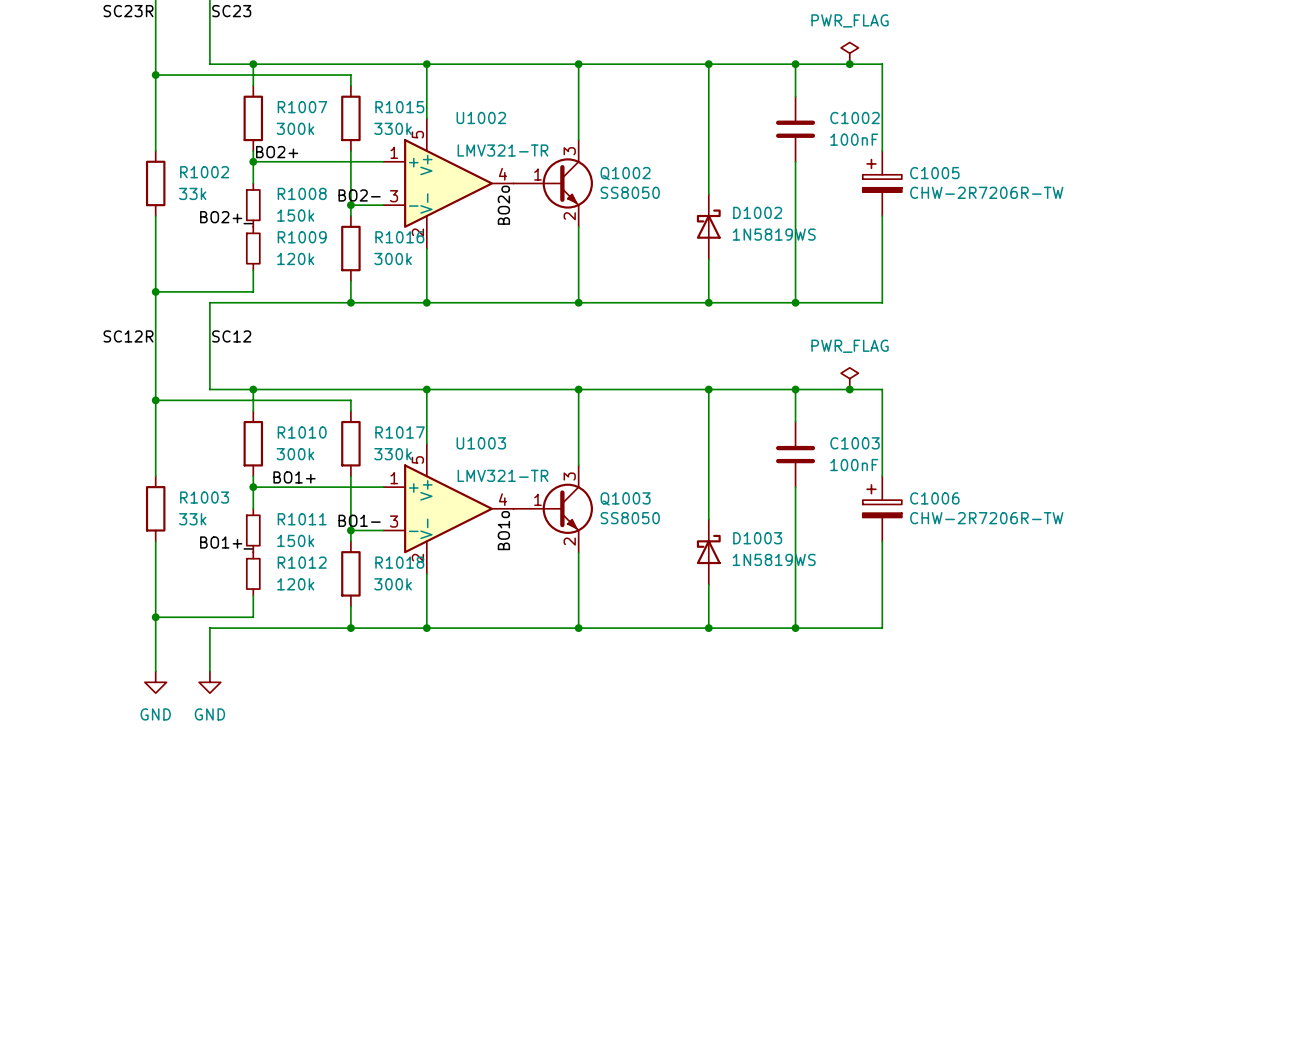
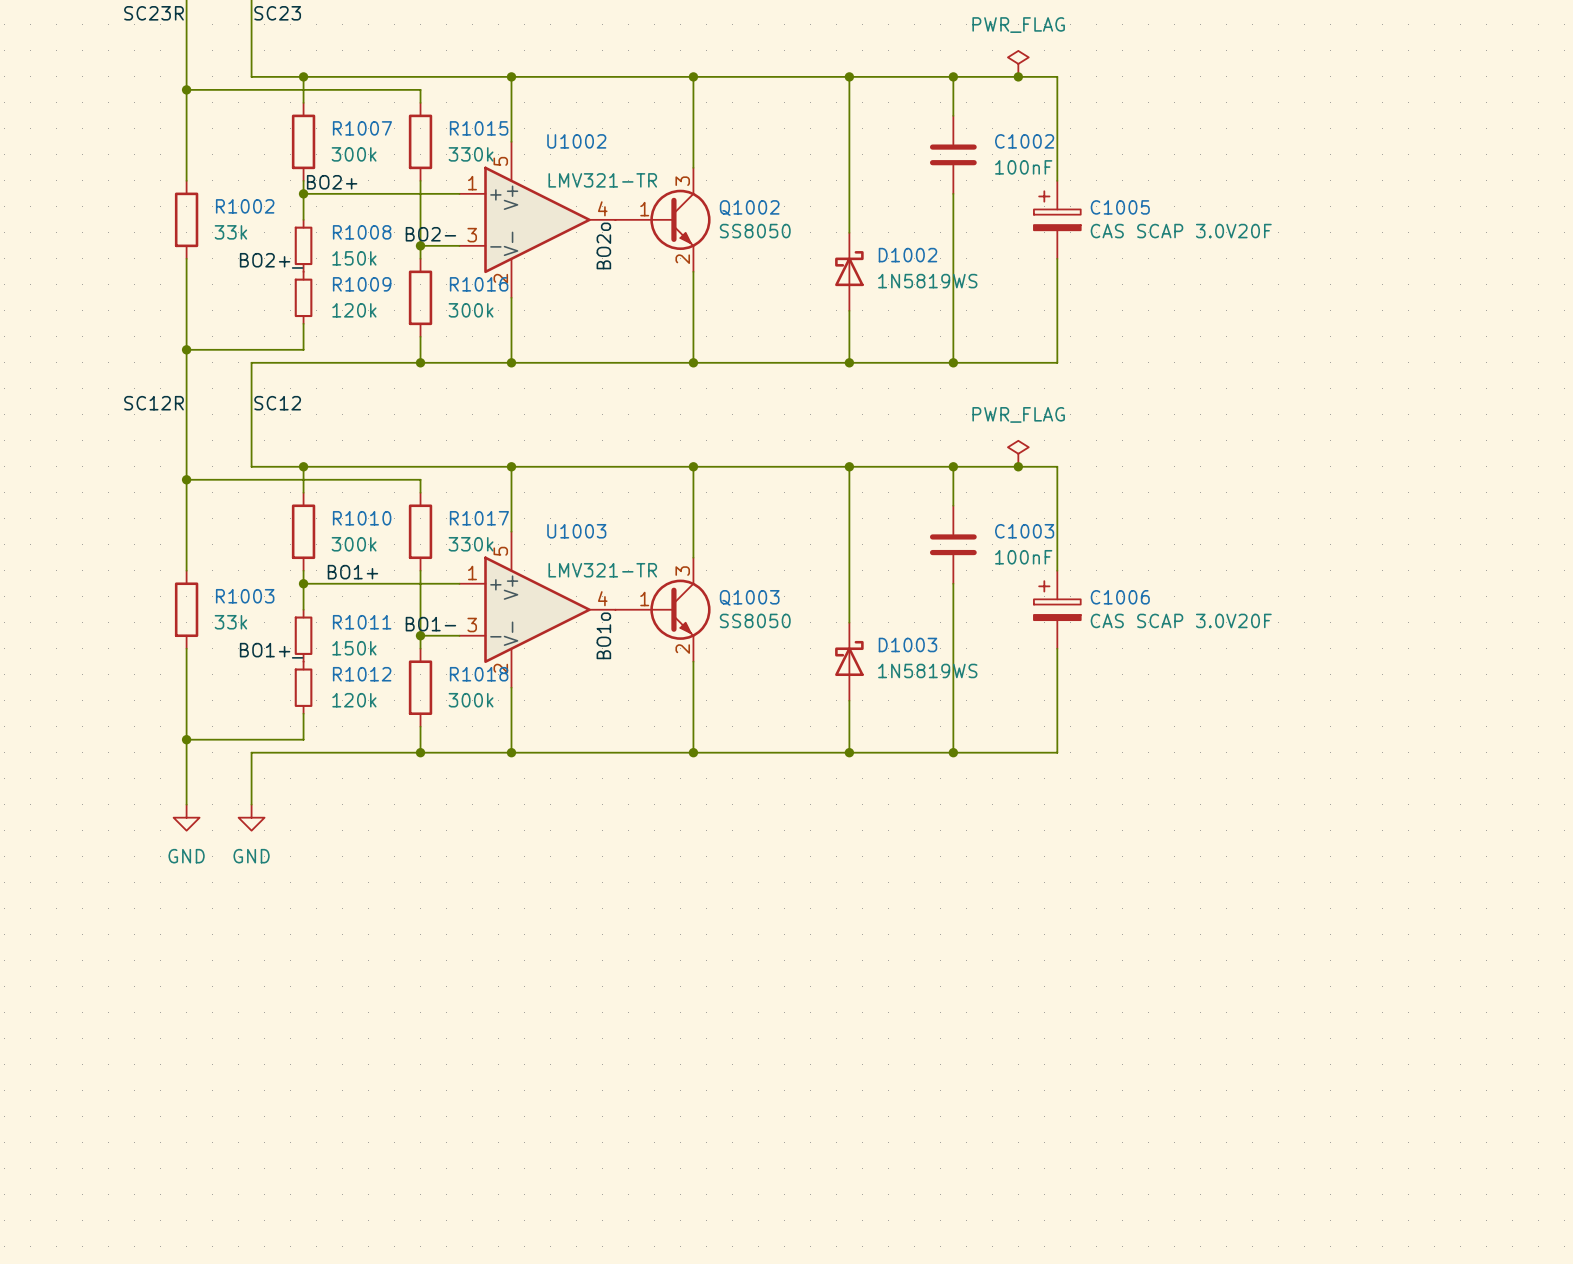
C1005 value: CHW-2R7206R-TW (986, 192) -> CAS SCAP 3.0V20F (1181, 231)
C1006 value: CHW-2R7206R-TW (986, 518) -> CAS SCAP 3.0V20F (1181, 620)

